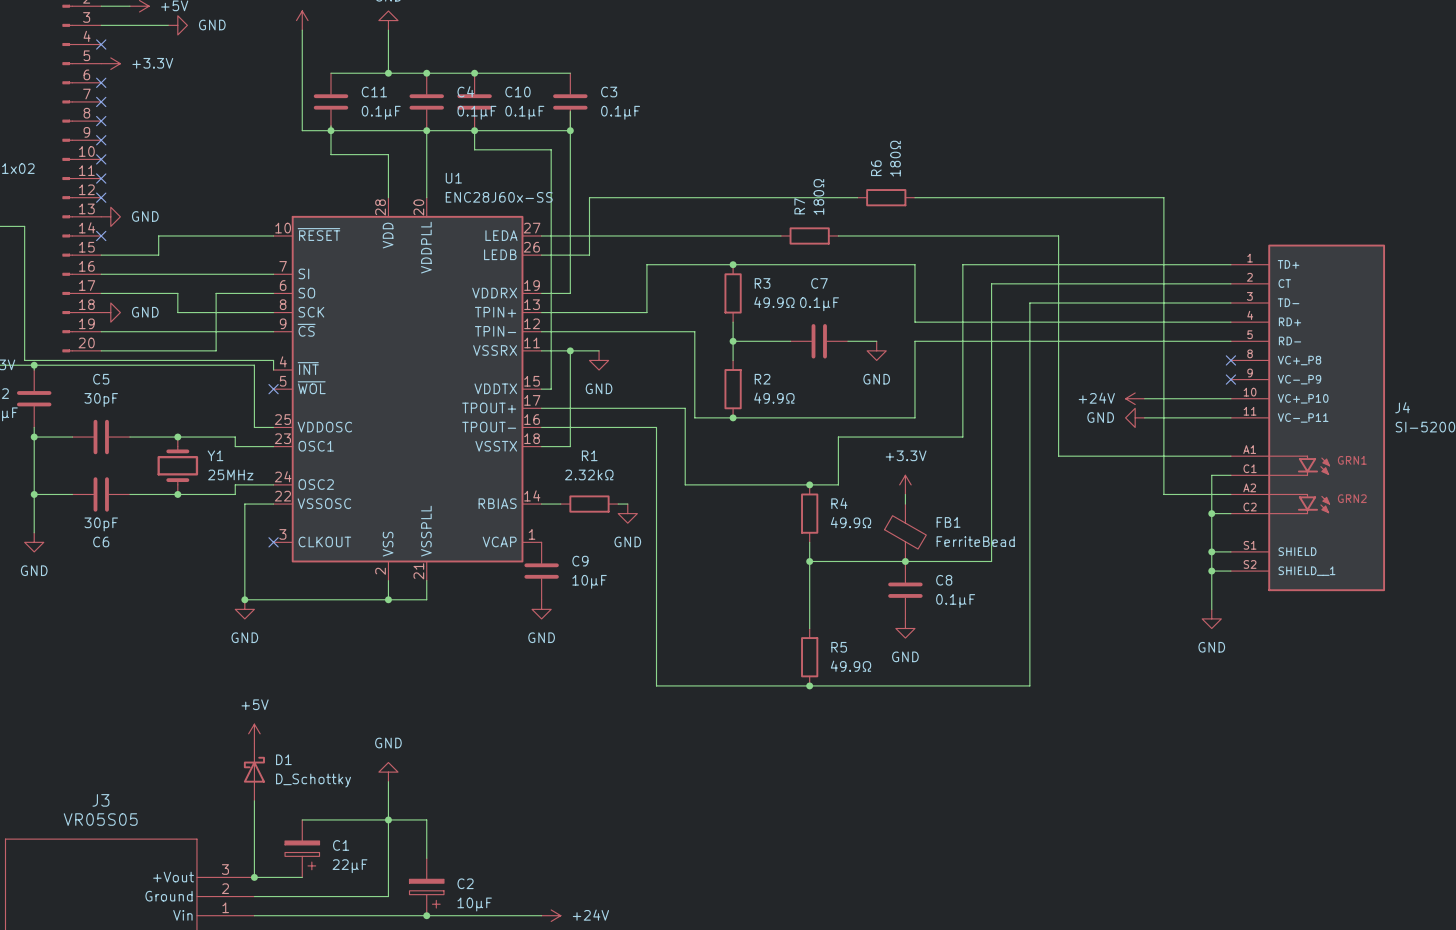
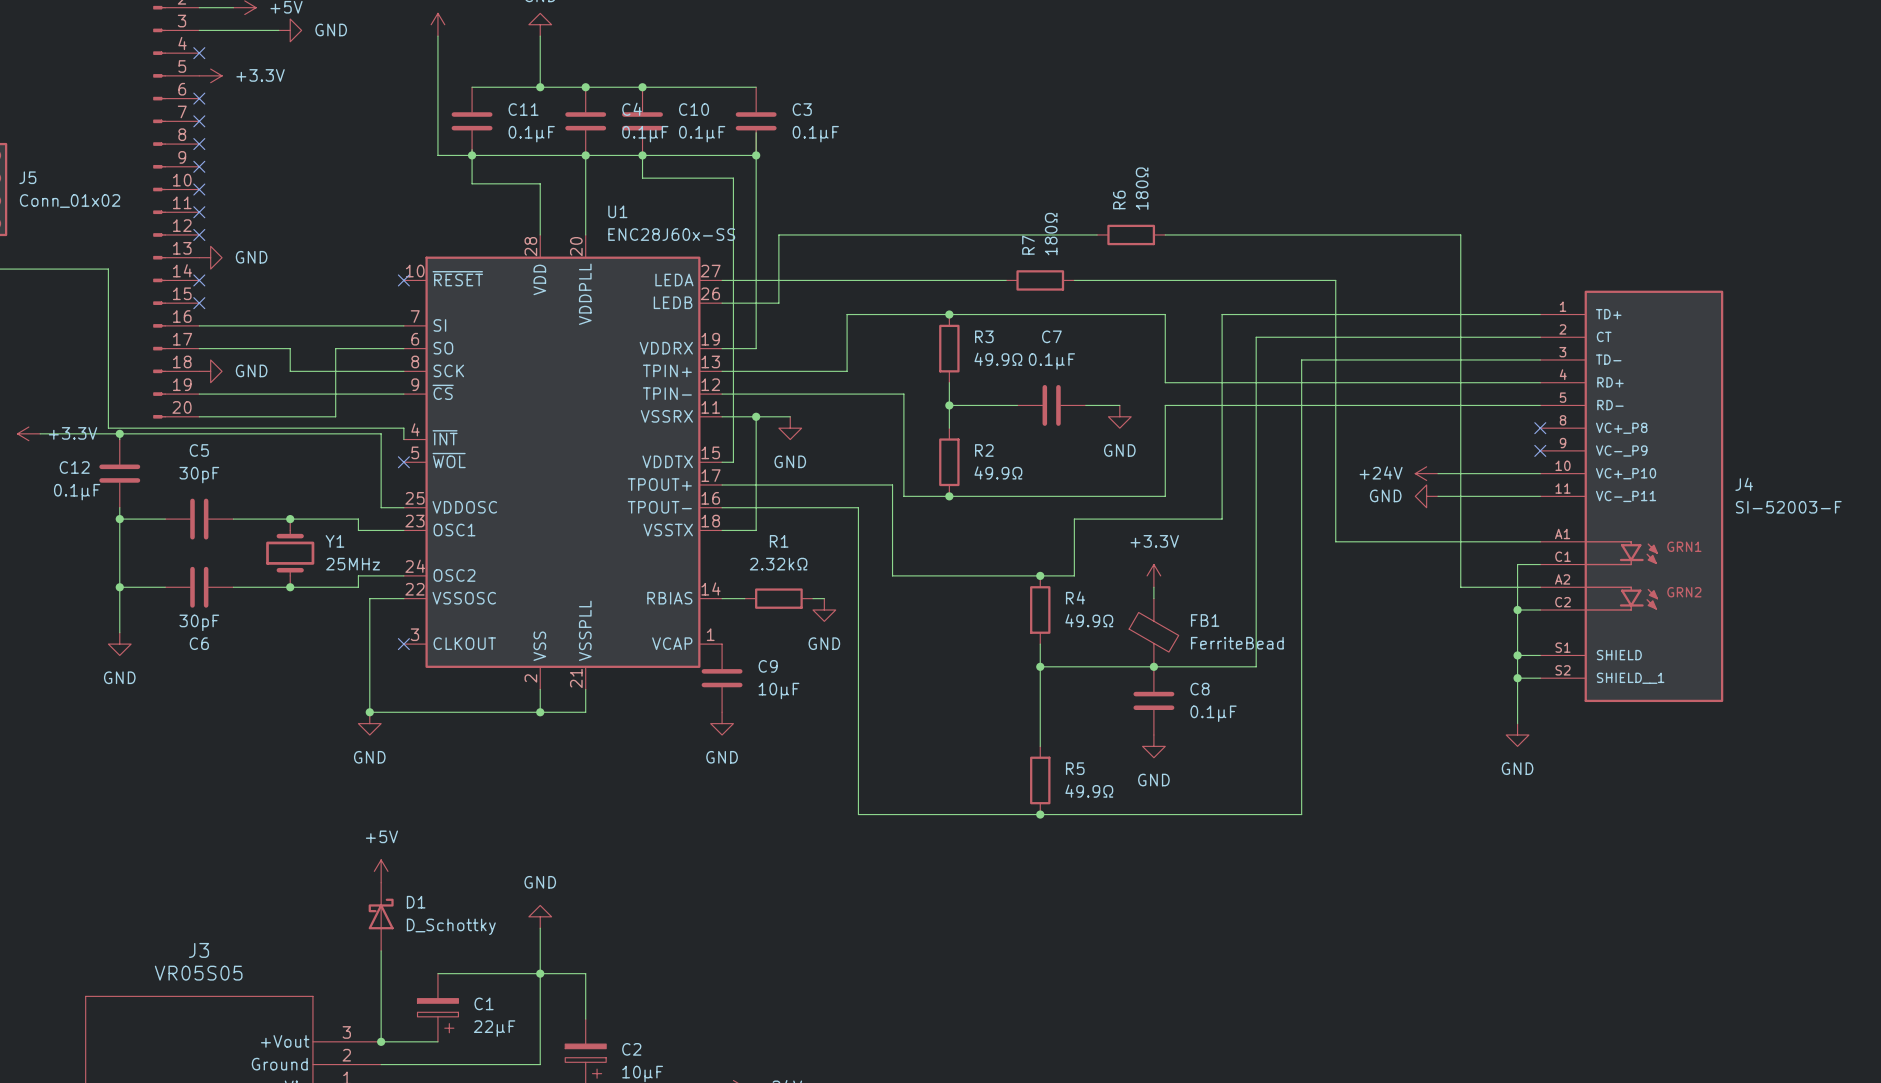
wire: (273, 235) (158, 235) (158, 255) (101, 255) -> none
no-connect mark: none -> (403, 280)
no-connect mark: none -> (199, 303)

